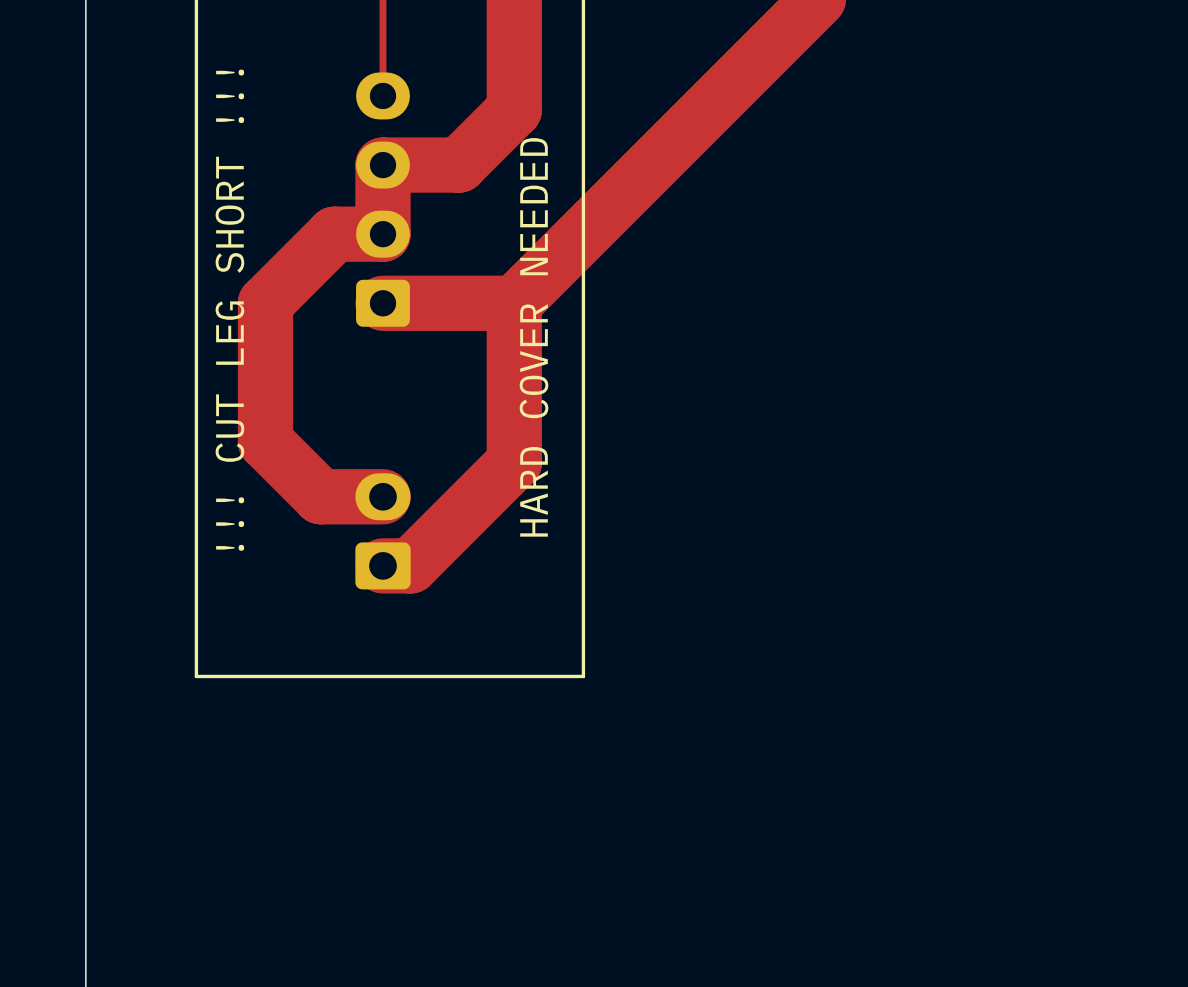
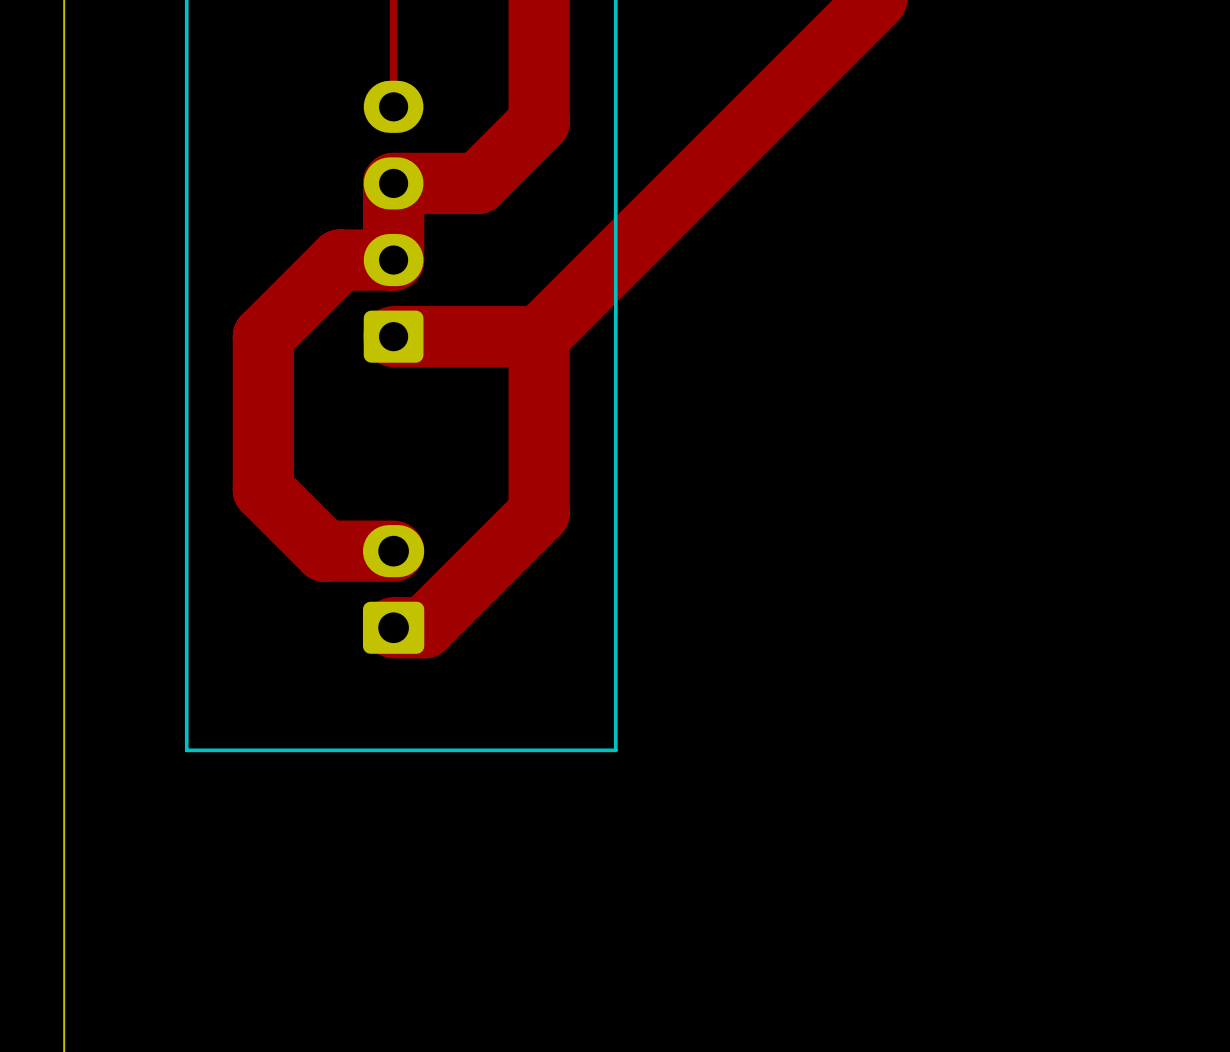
text: !!! CUT LEG SHORT !!! (229, 310) -> none
text: HARD COVER NEEDED (534, 337) -> none

